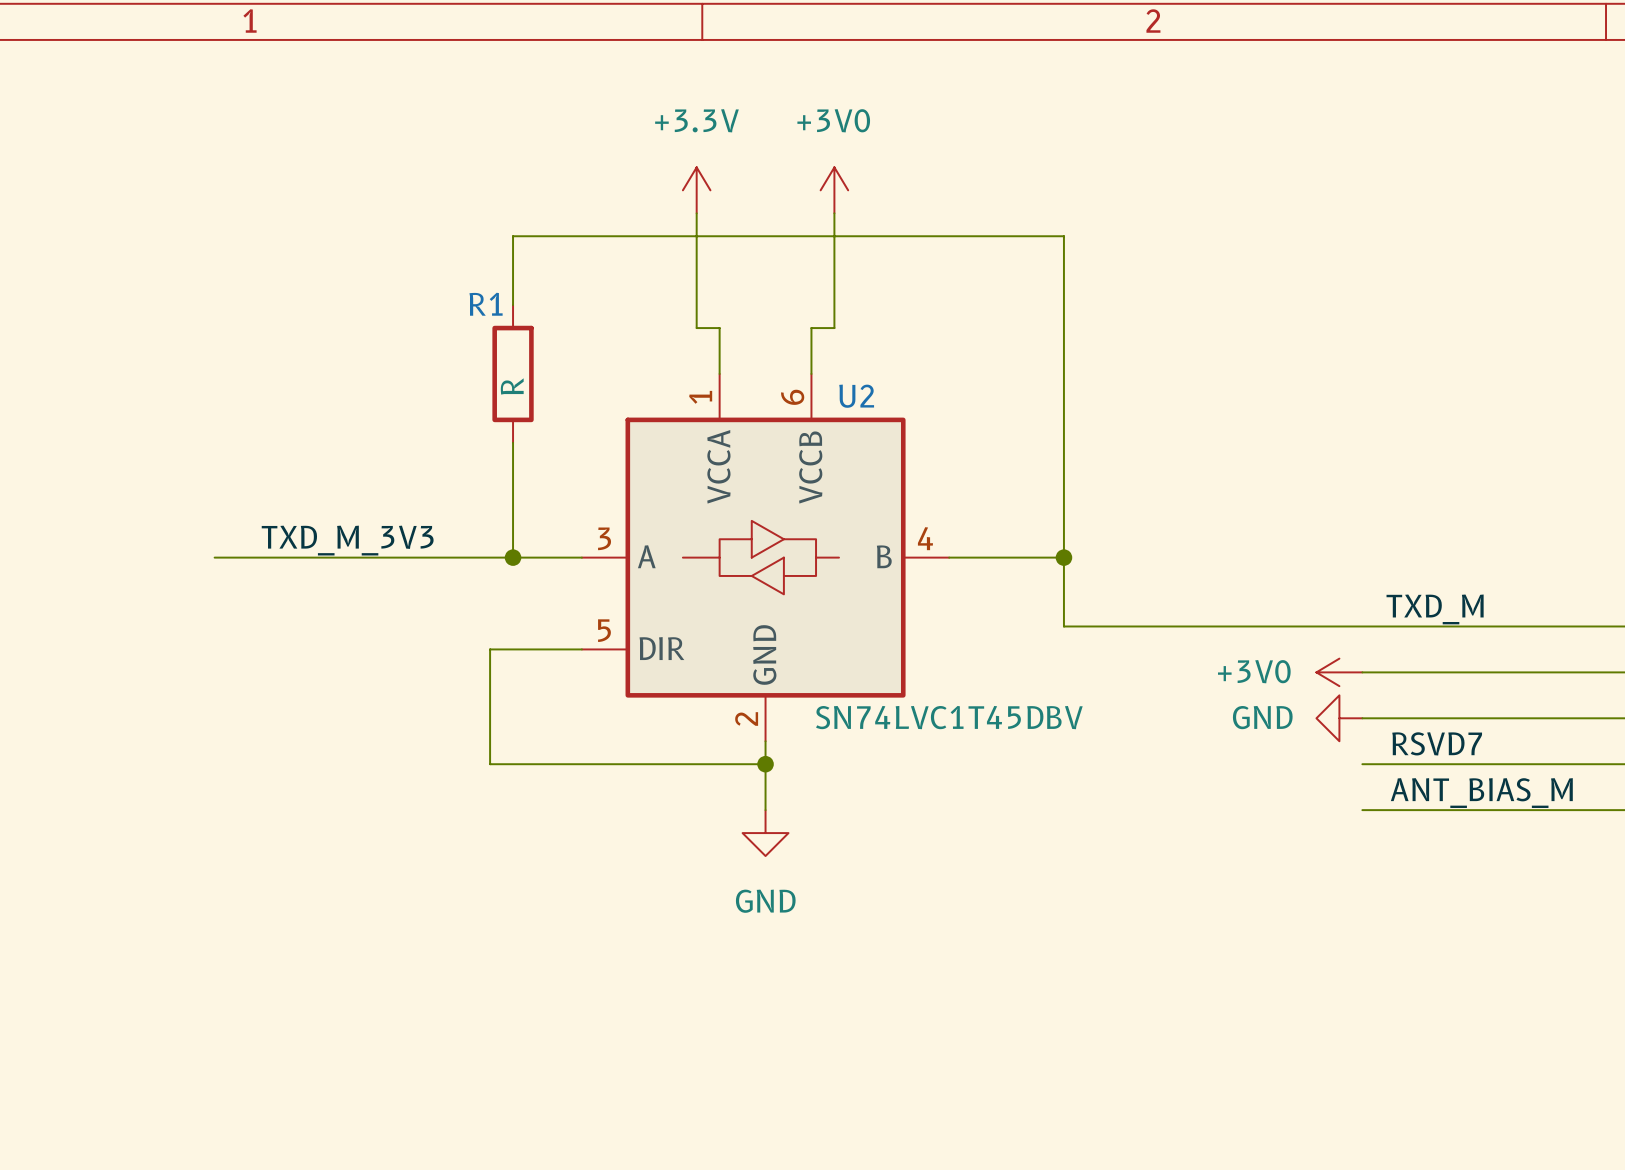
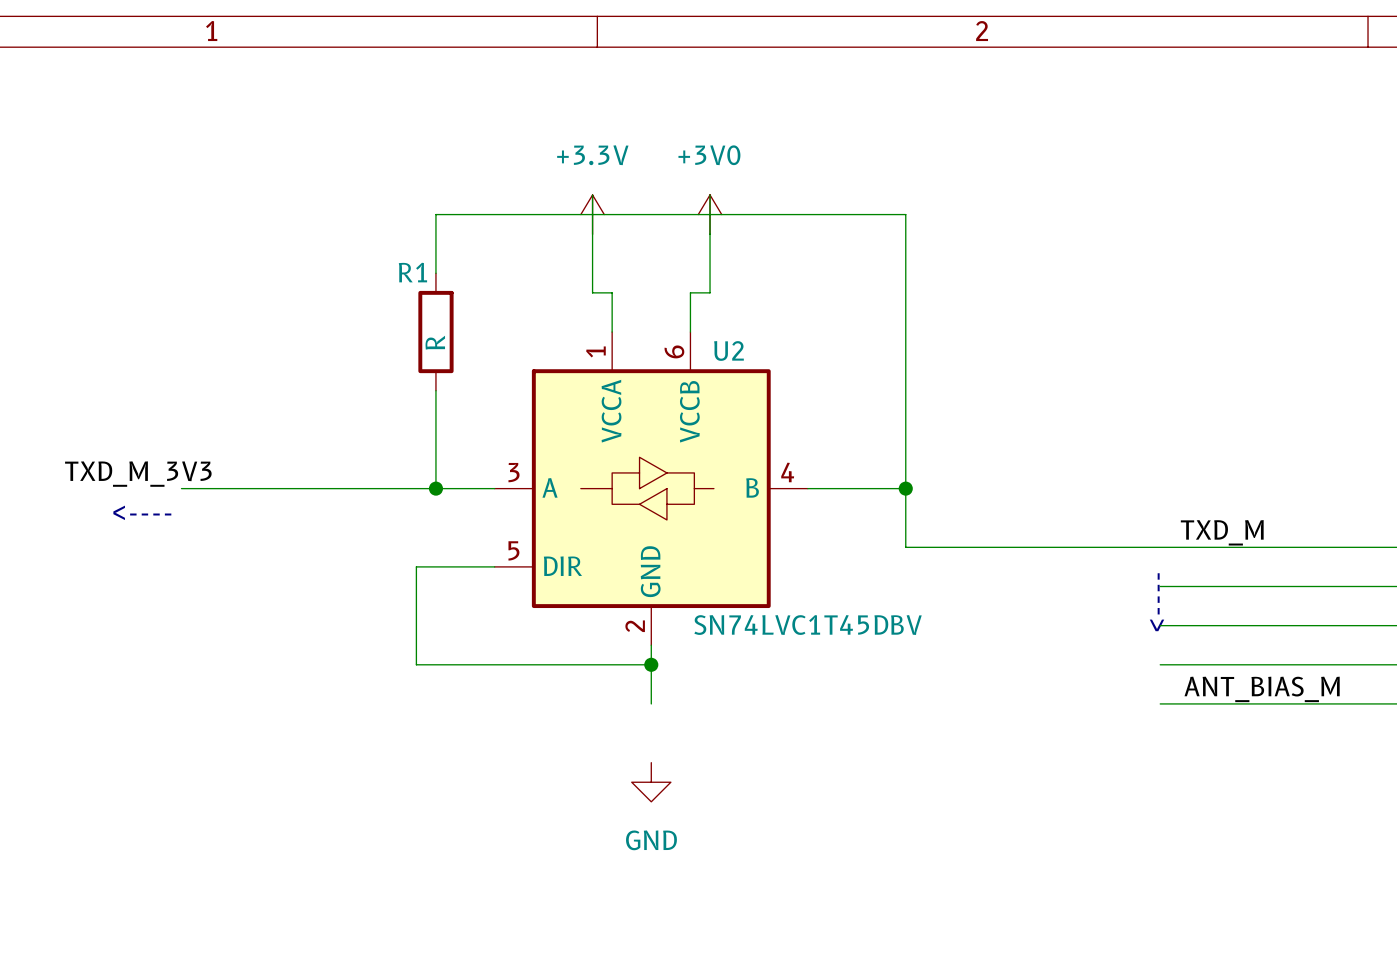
power symbol position: +3.3V (696, 190) -> +3.3V (592, 214)
power symbol position: +3V0 (834, 190) -> +3V0 (710, 214)
label position: TXD_M_3V3 (347, 540) -> TXD_M_3V3 (138, 474)
text: none -> <---- (142, 512)
power symbol: +3V0 (1339, 672) -> none
text: none -> <---- (1156, 602)
power symbol: GND (1339, 718) -> none
label: RSVD7 (1437, 743) -> none
power symbol position: GND (765, 833) -> GND (651, 782)

